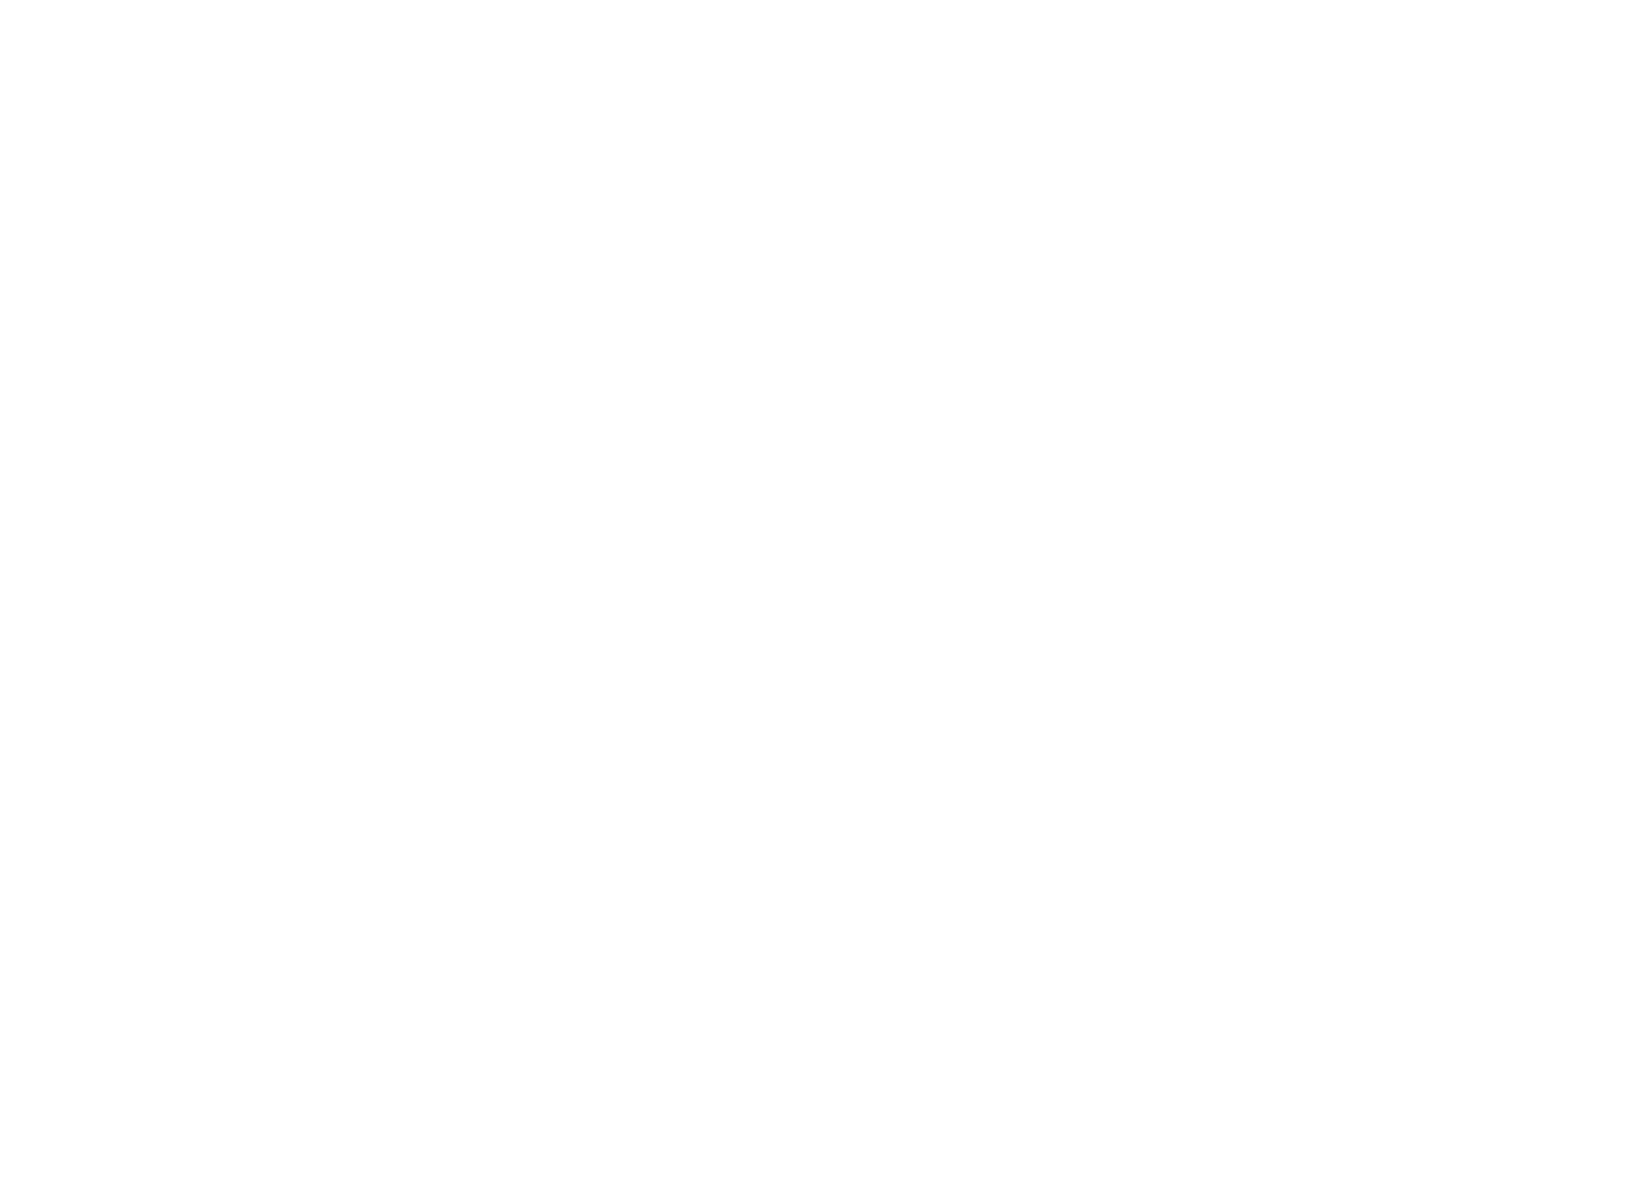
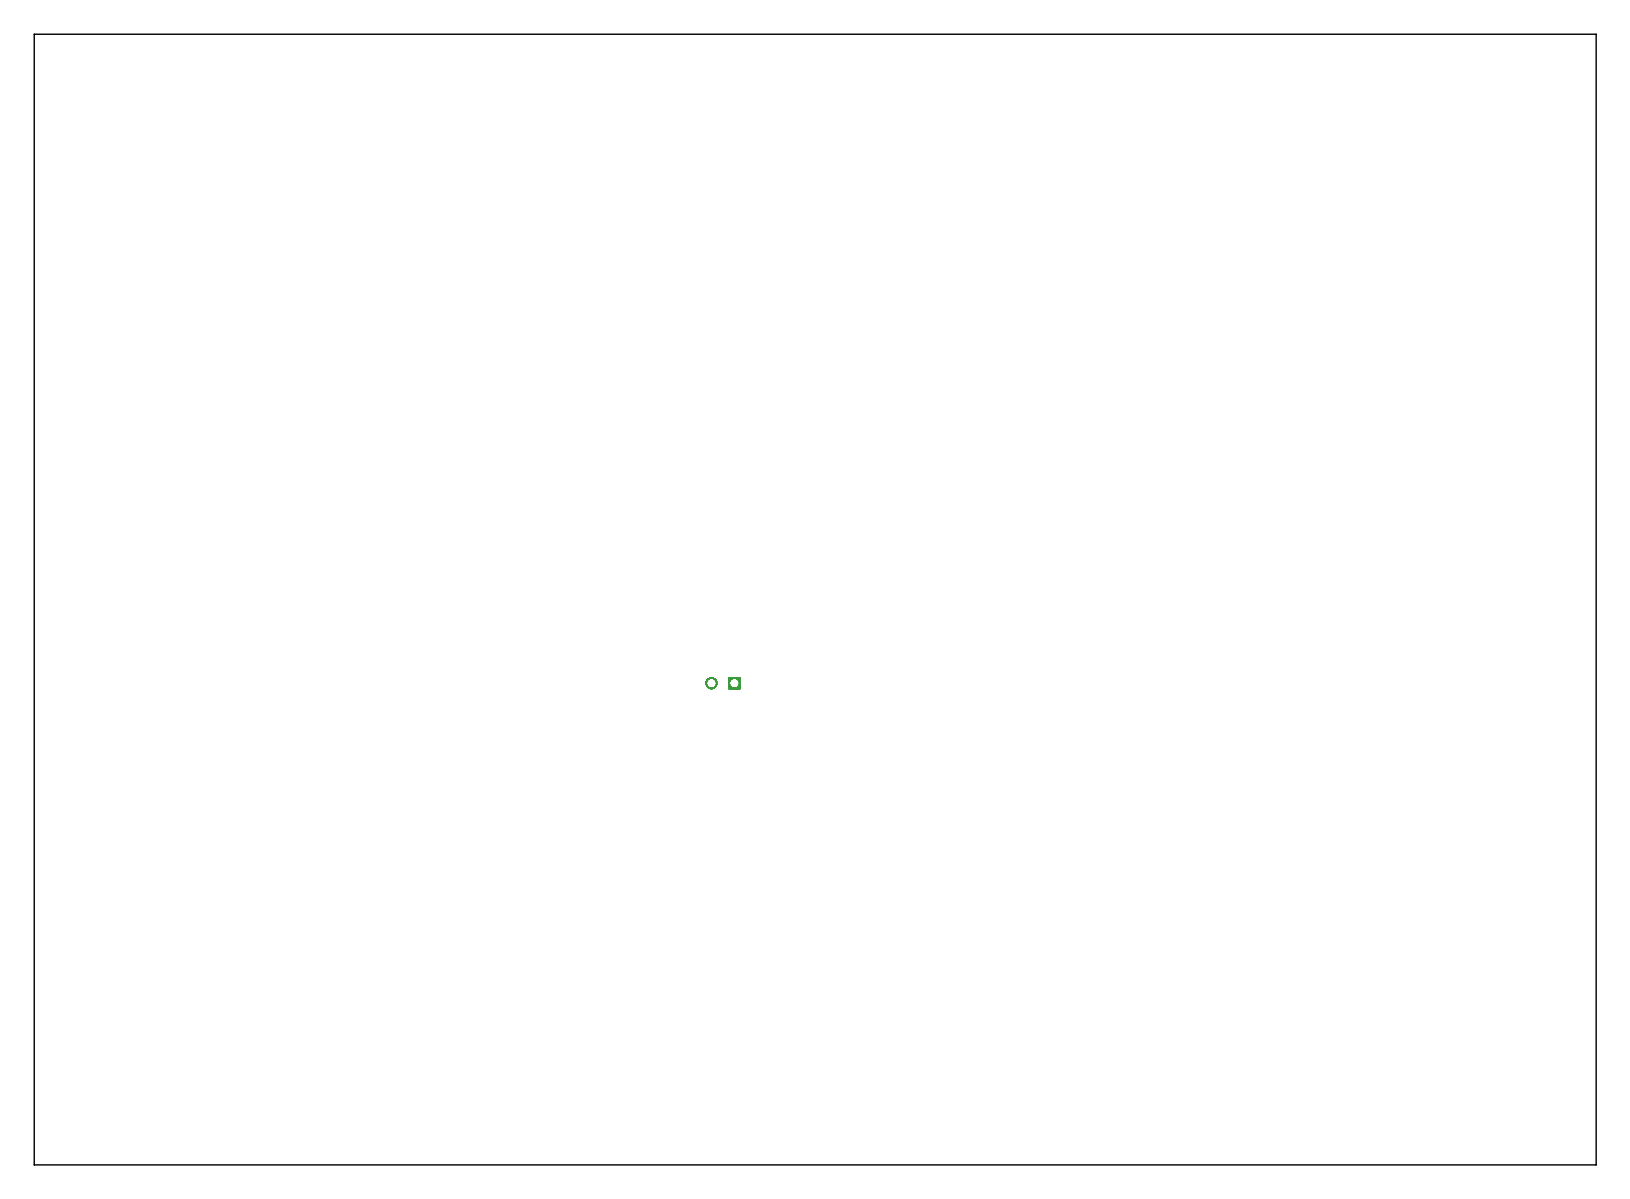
board edge: none -> (1596, 34) (1596, 1164) (34, 1164) (34, 34) (1596, 34)
part: none -> (722, 683)
part: none -> (722, 683)

